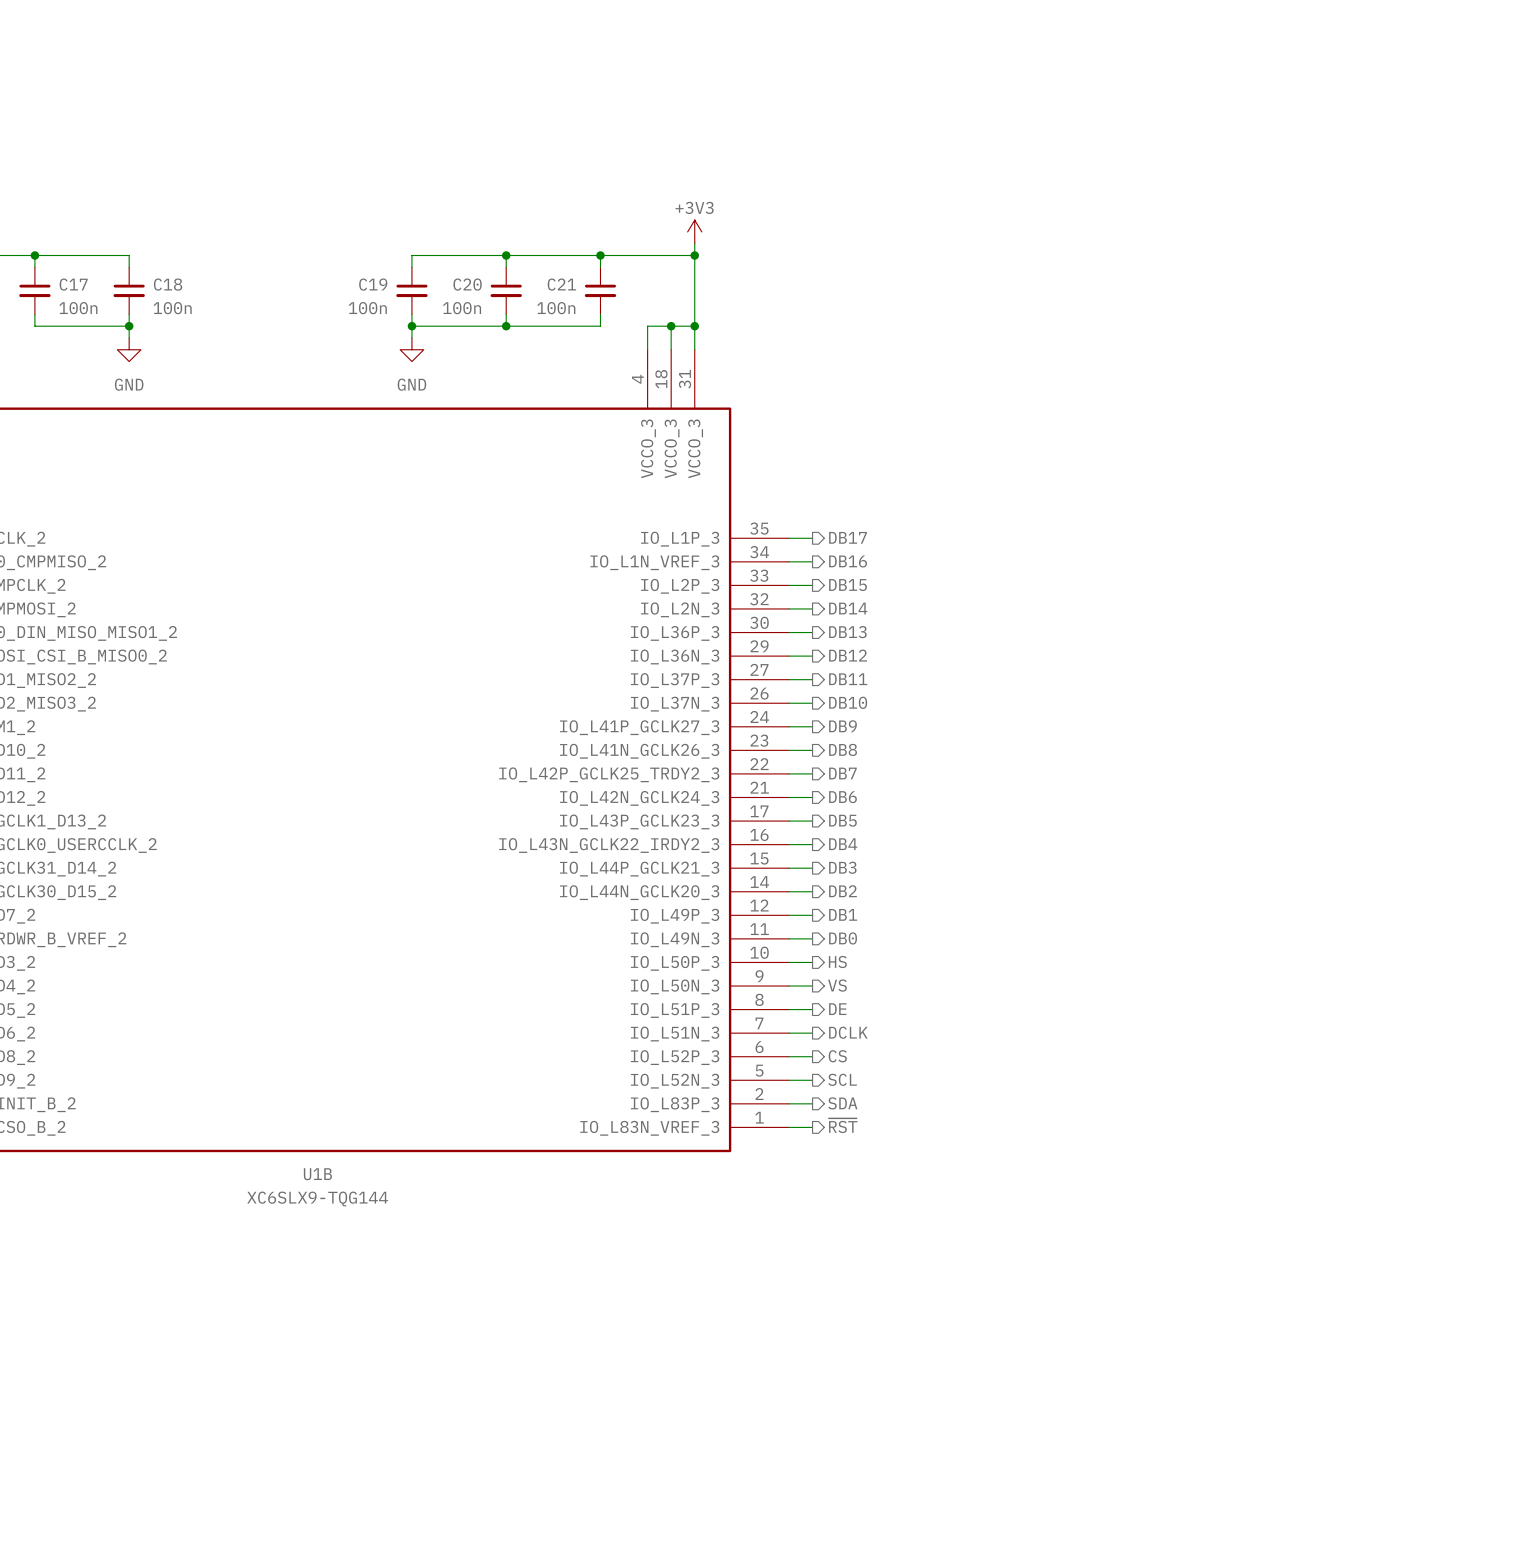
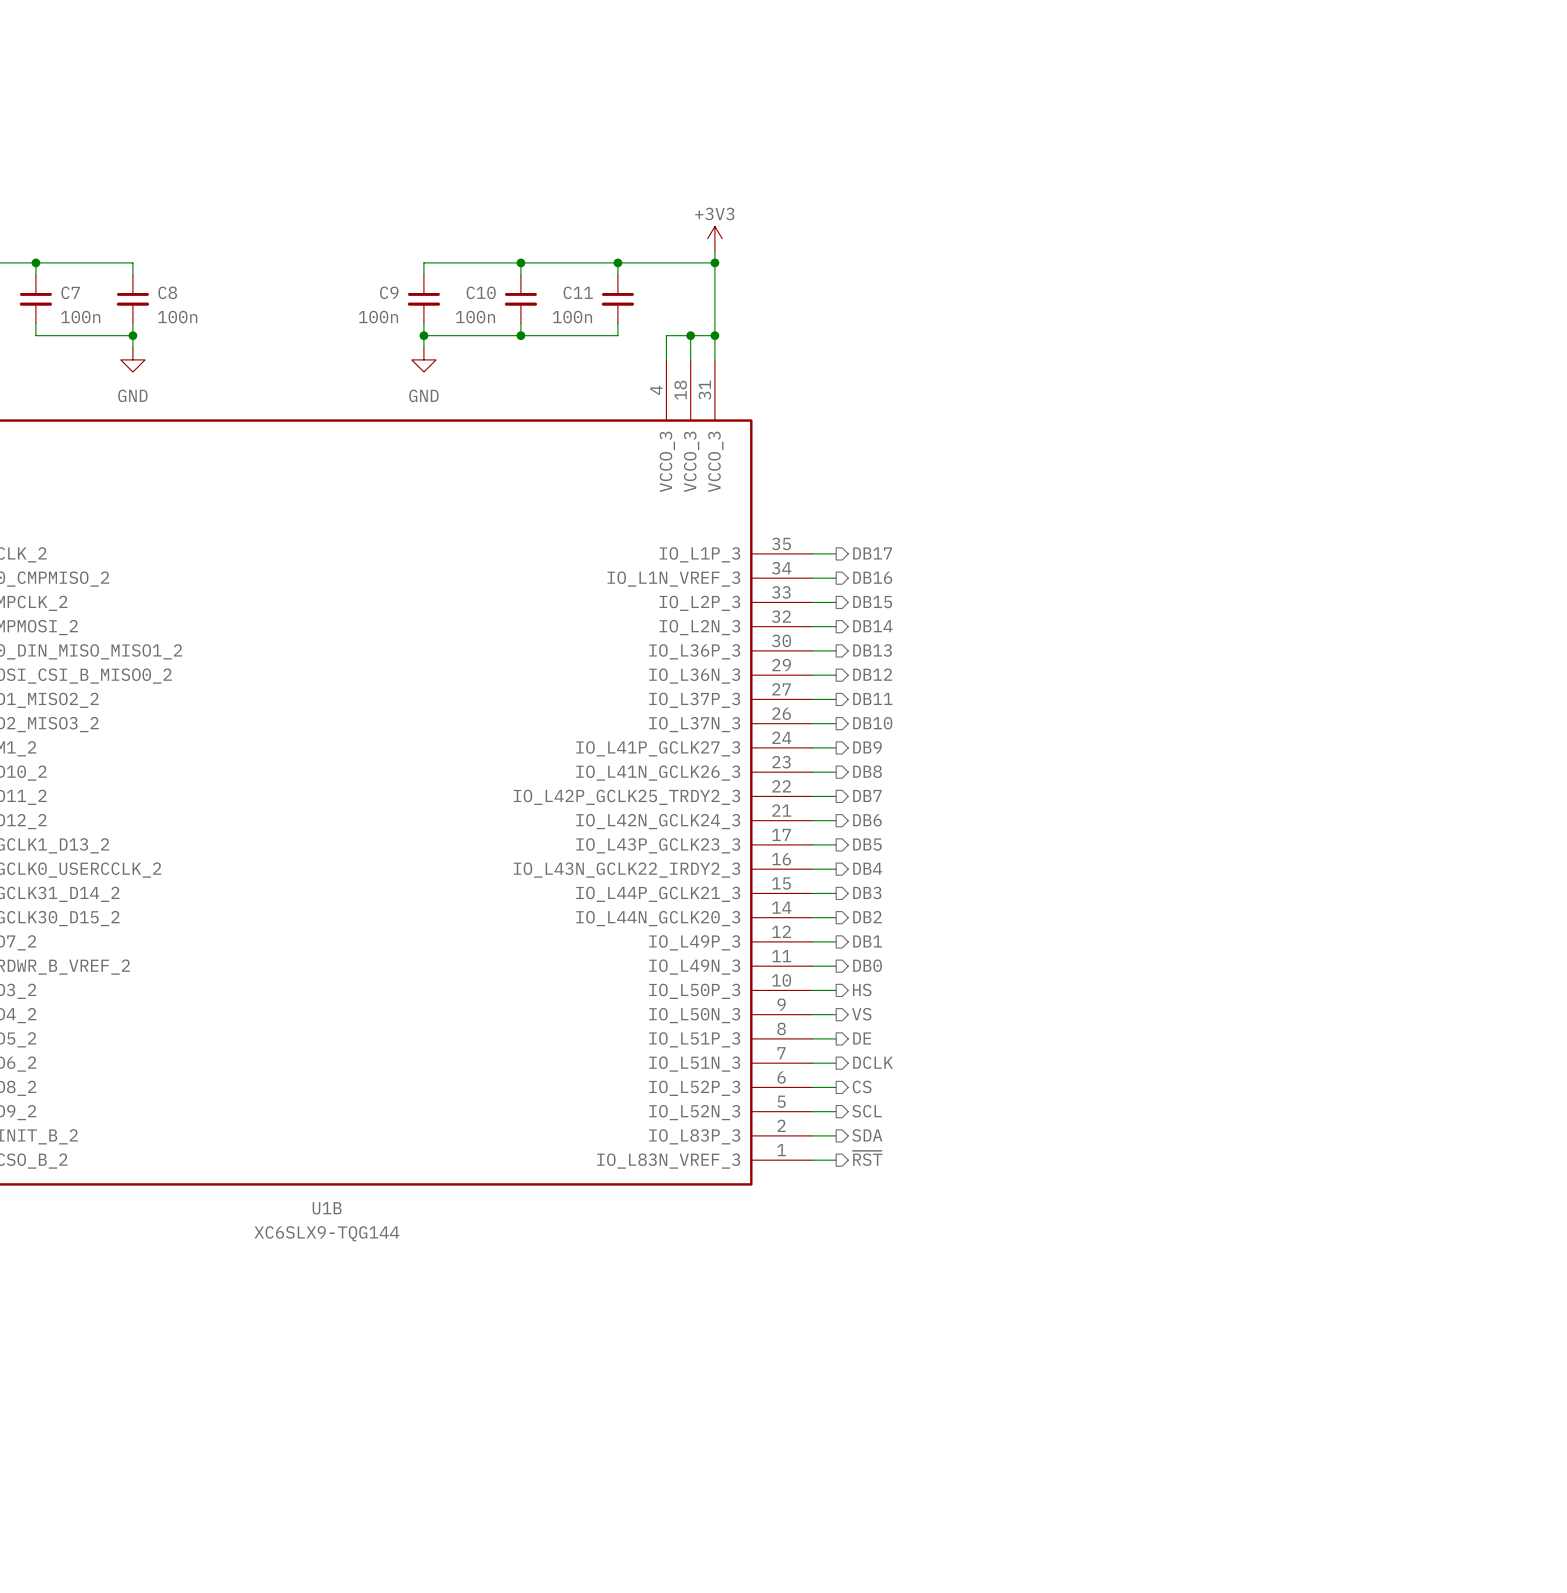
C17 name: C17 (73, 284) -> C7 (70, 292)
C18 name: C18 (168, 284) -> C8 (167, 292)
C19 name: C19 (373, 284) -> C9 (389, 292)
C20 name: C20 (467, 284) -> C10 (481, 292)
C21 name: C21 (561, 284) -> C11 (578, 292)

